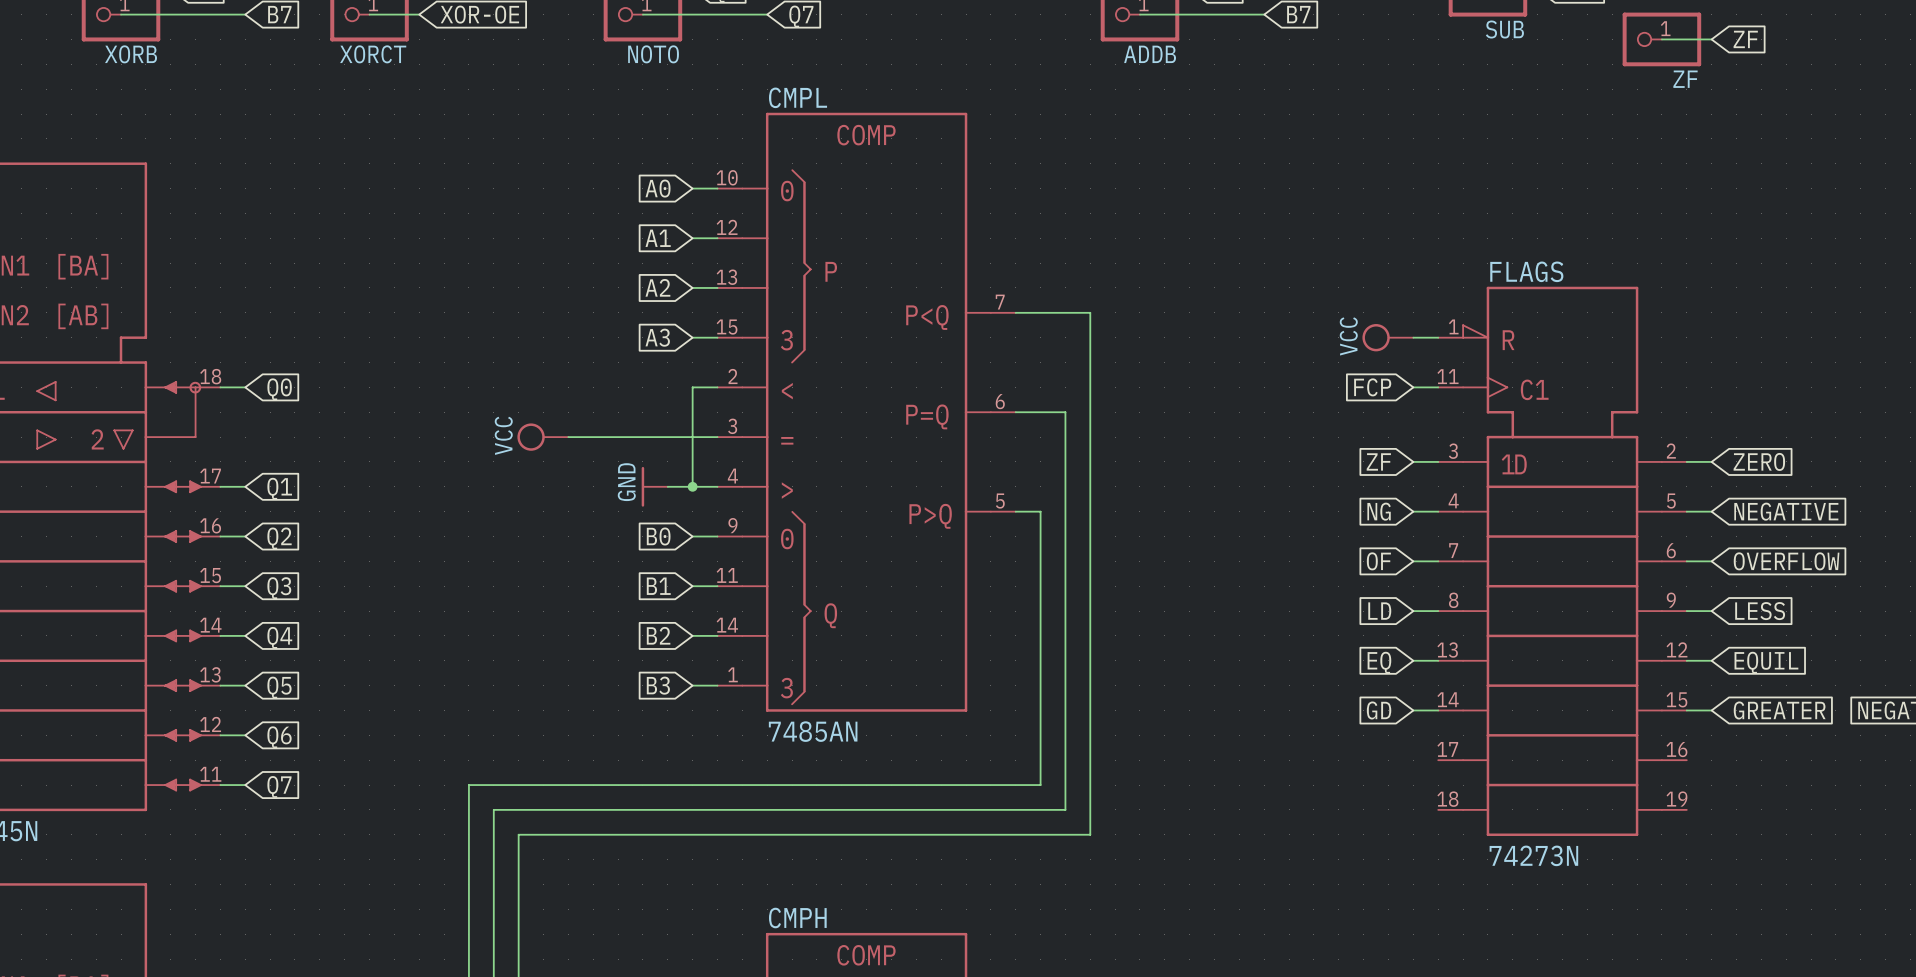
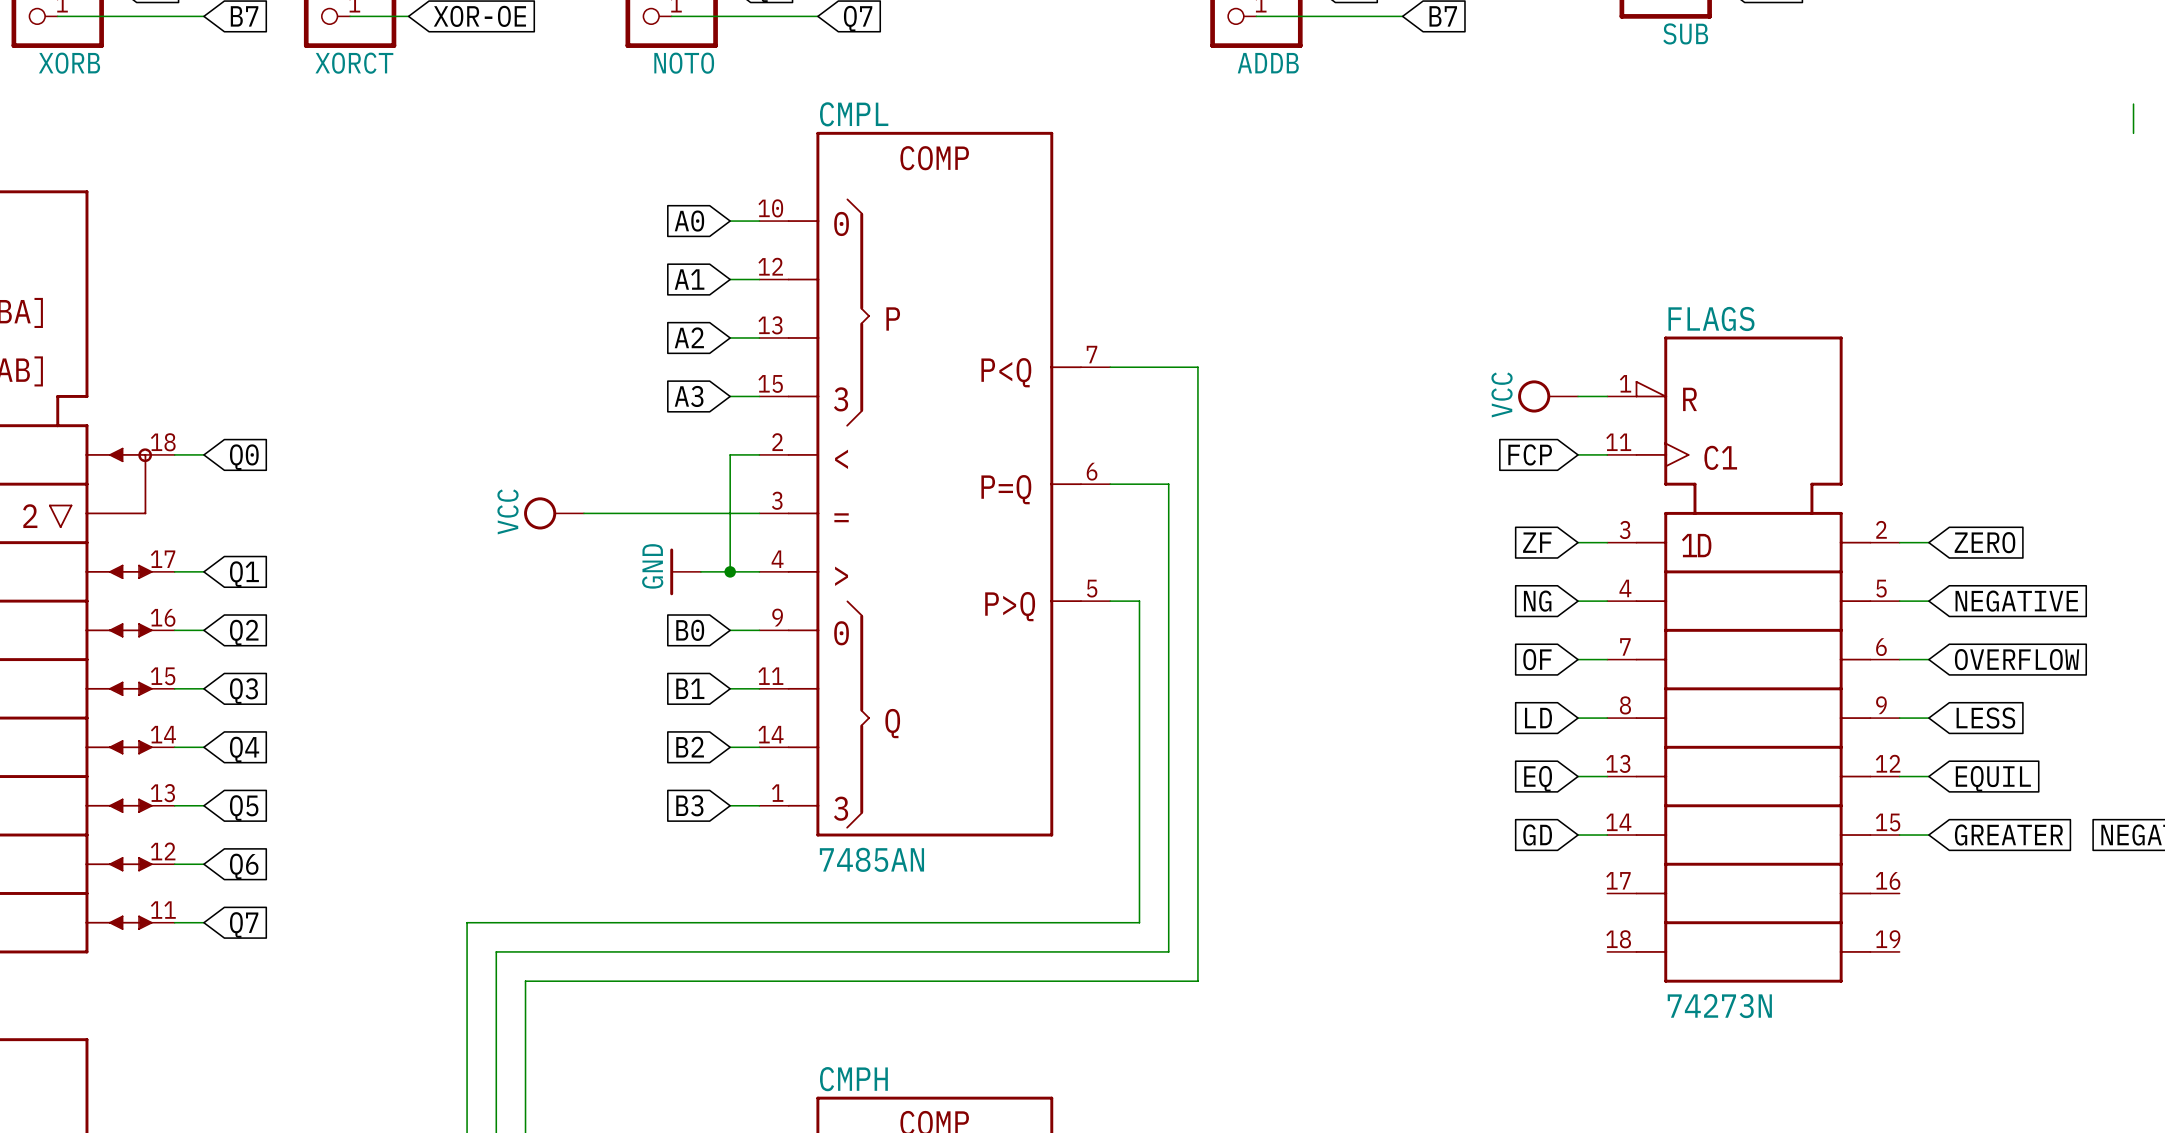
wire: (1661, 39) (1711, 39) -> none
ZF: (1661, 39) -> none
global label: ZF (1745, 39) -> none
wire: none -> (2133, 104) (2133, 133)

